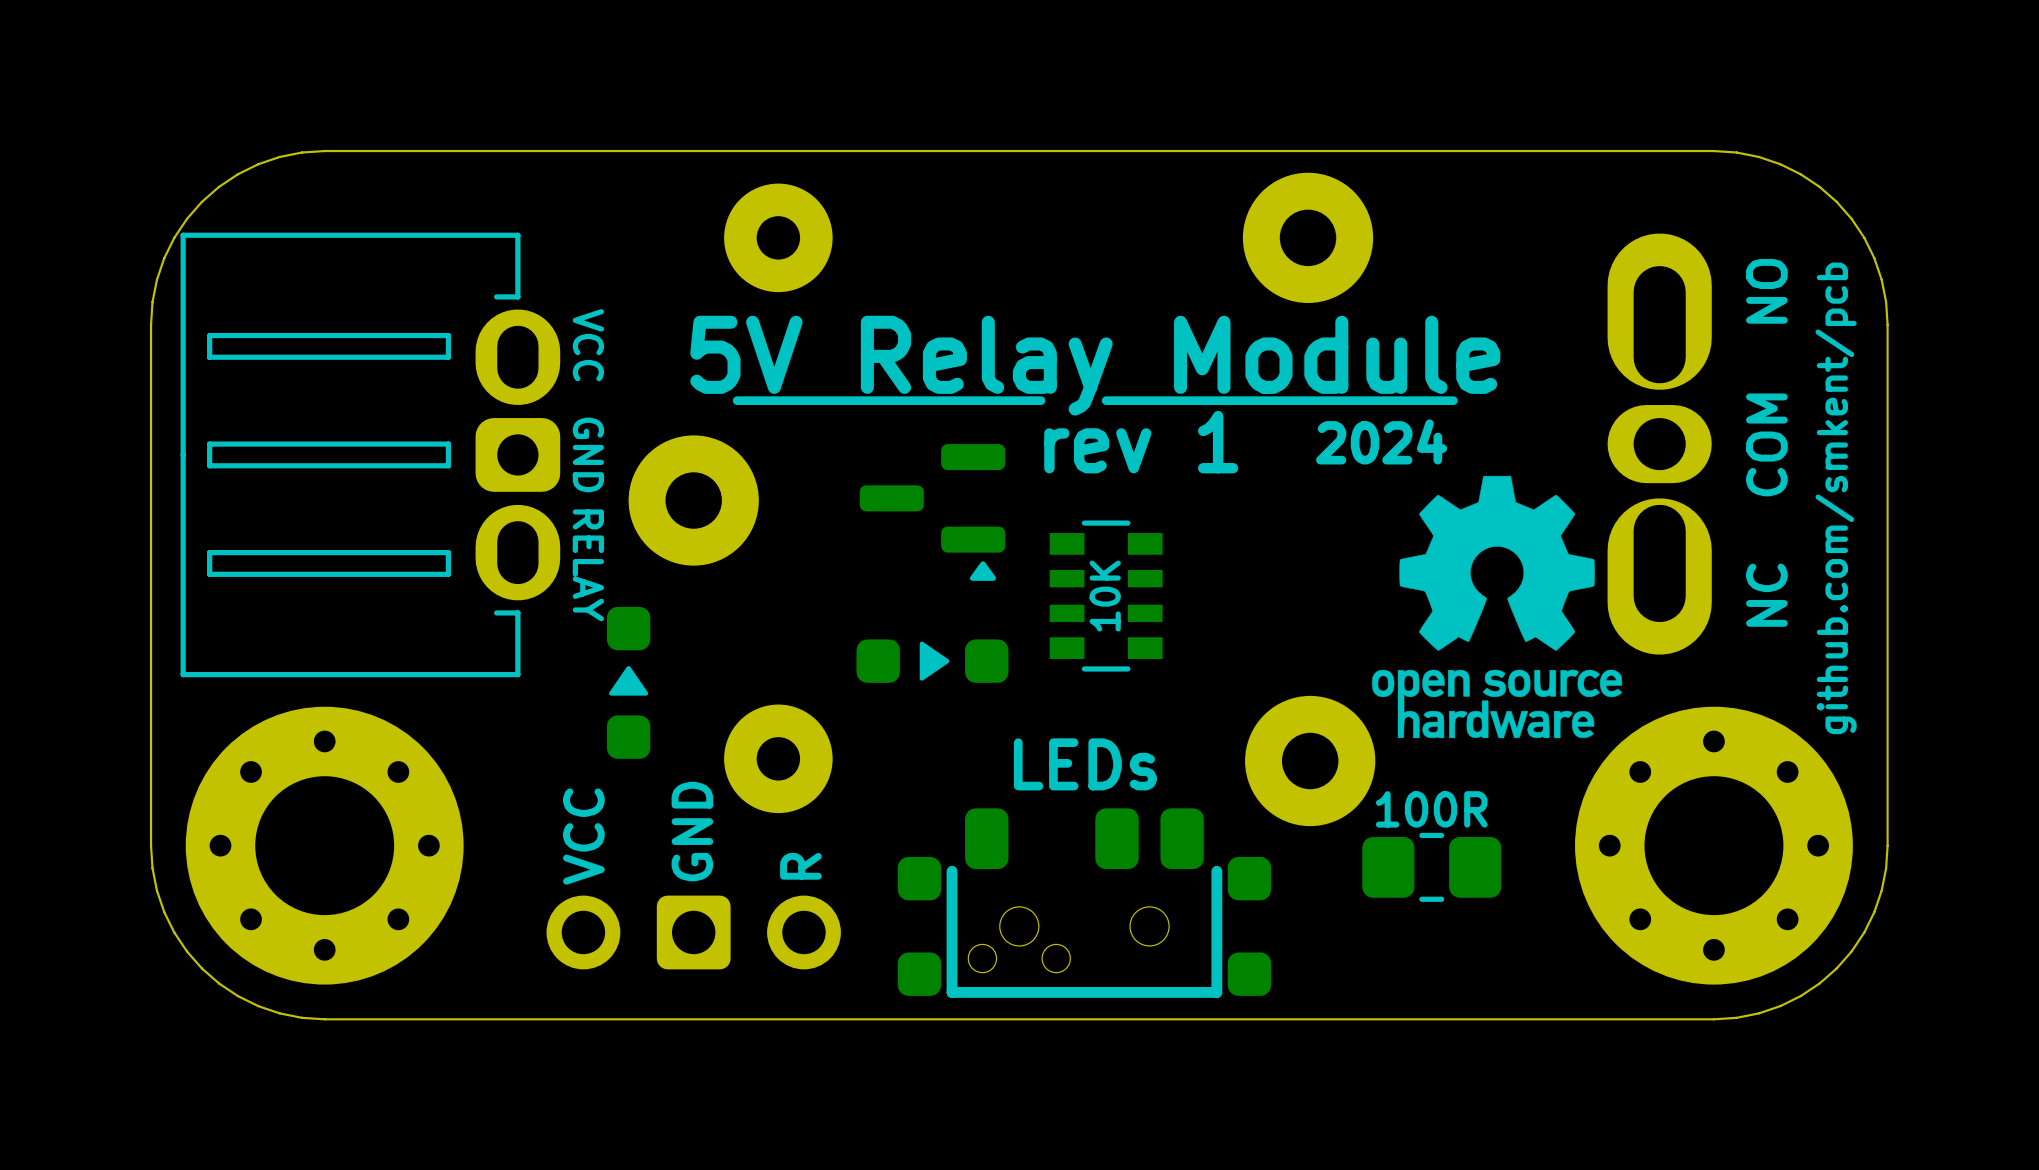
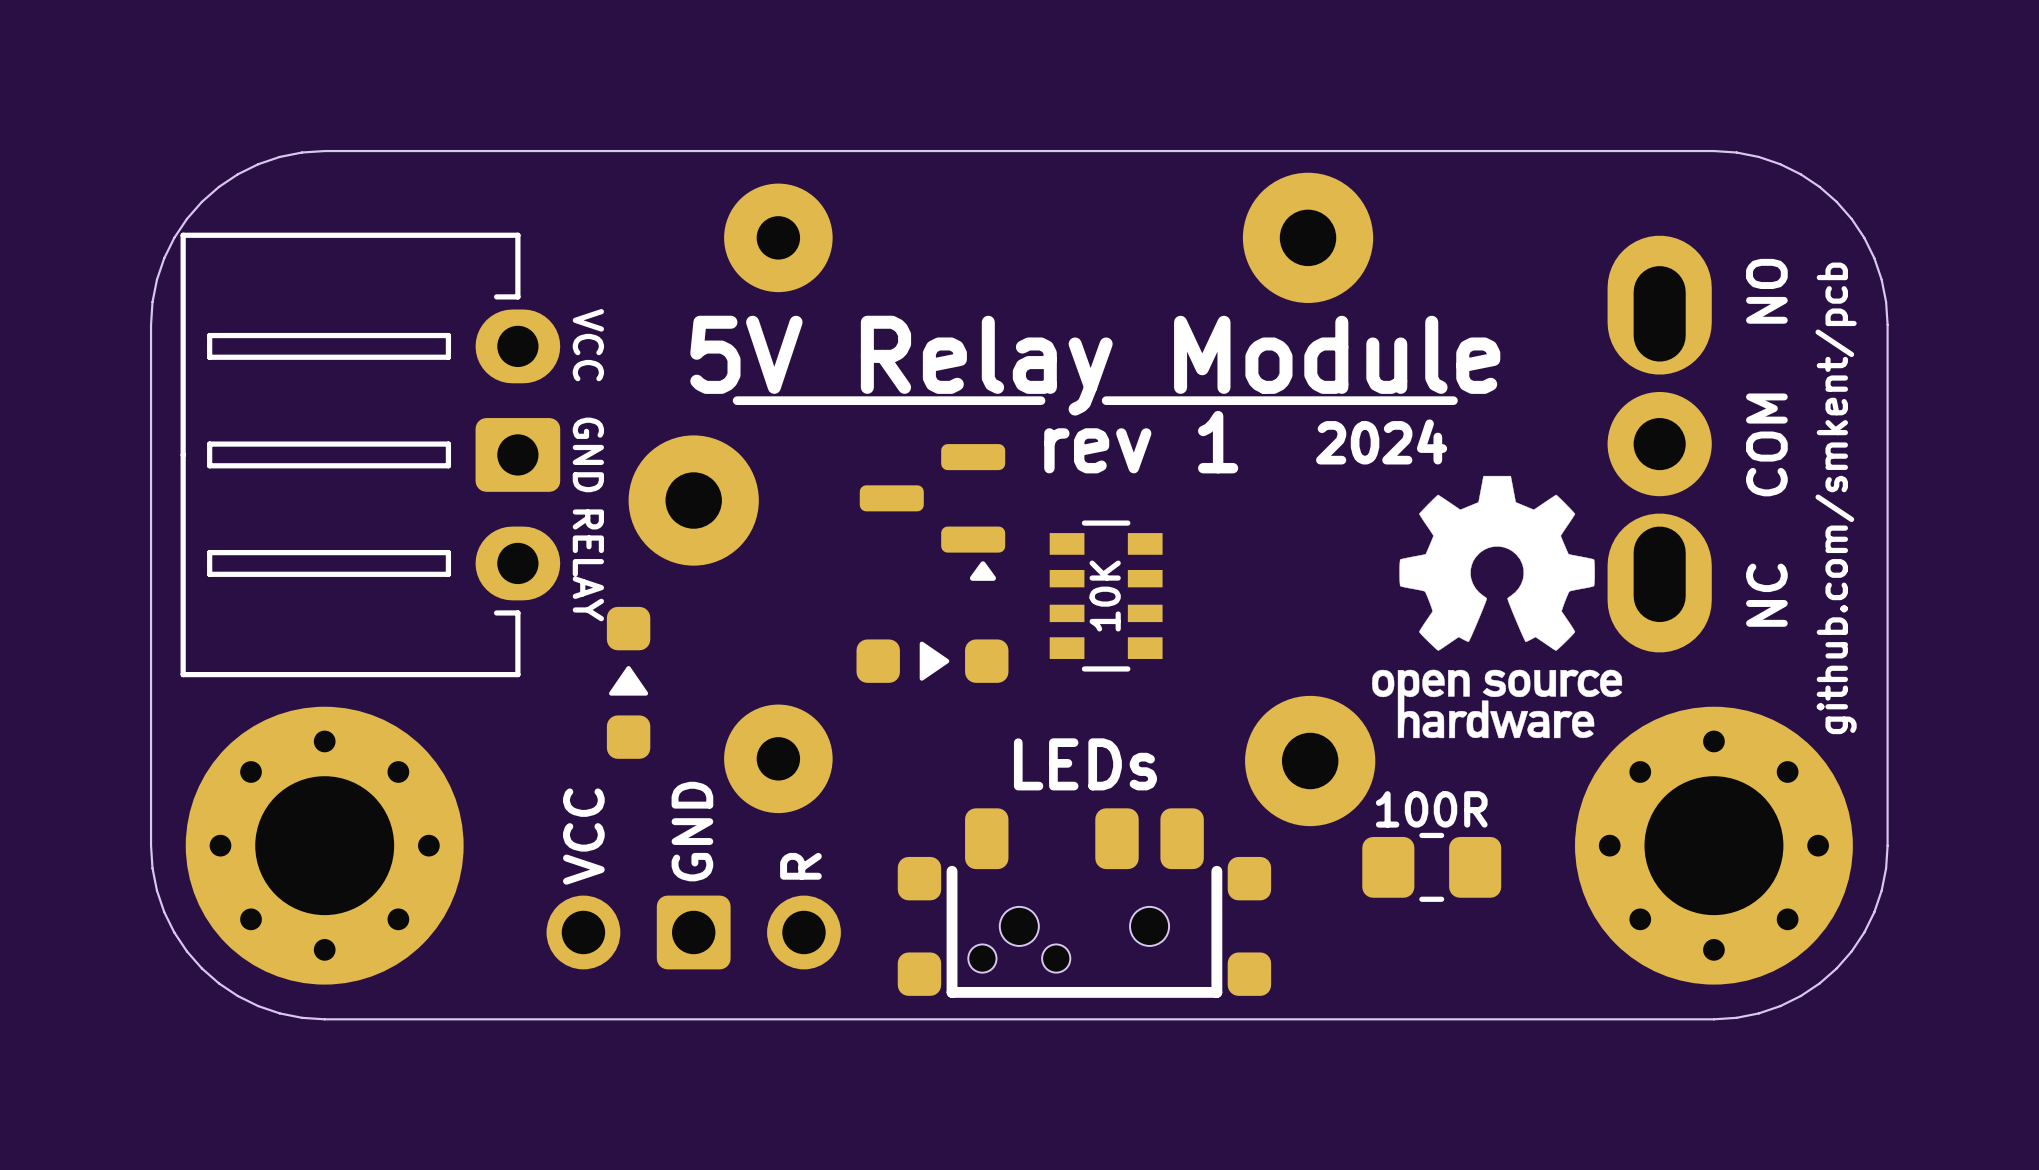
part footprint: [180, 232, 561, 678] -> [180, 232, 561, 678]
part footprint: [1607, 233, 1712, 655] -> [1607, 235, 1712, 653]

